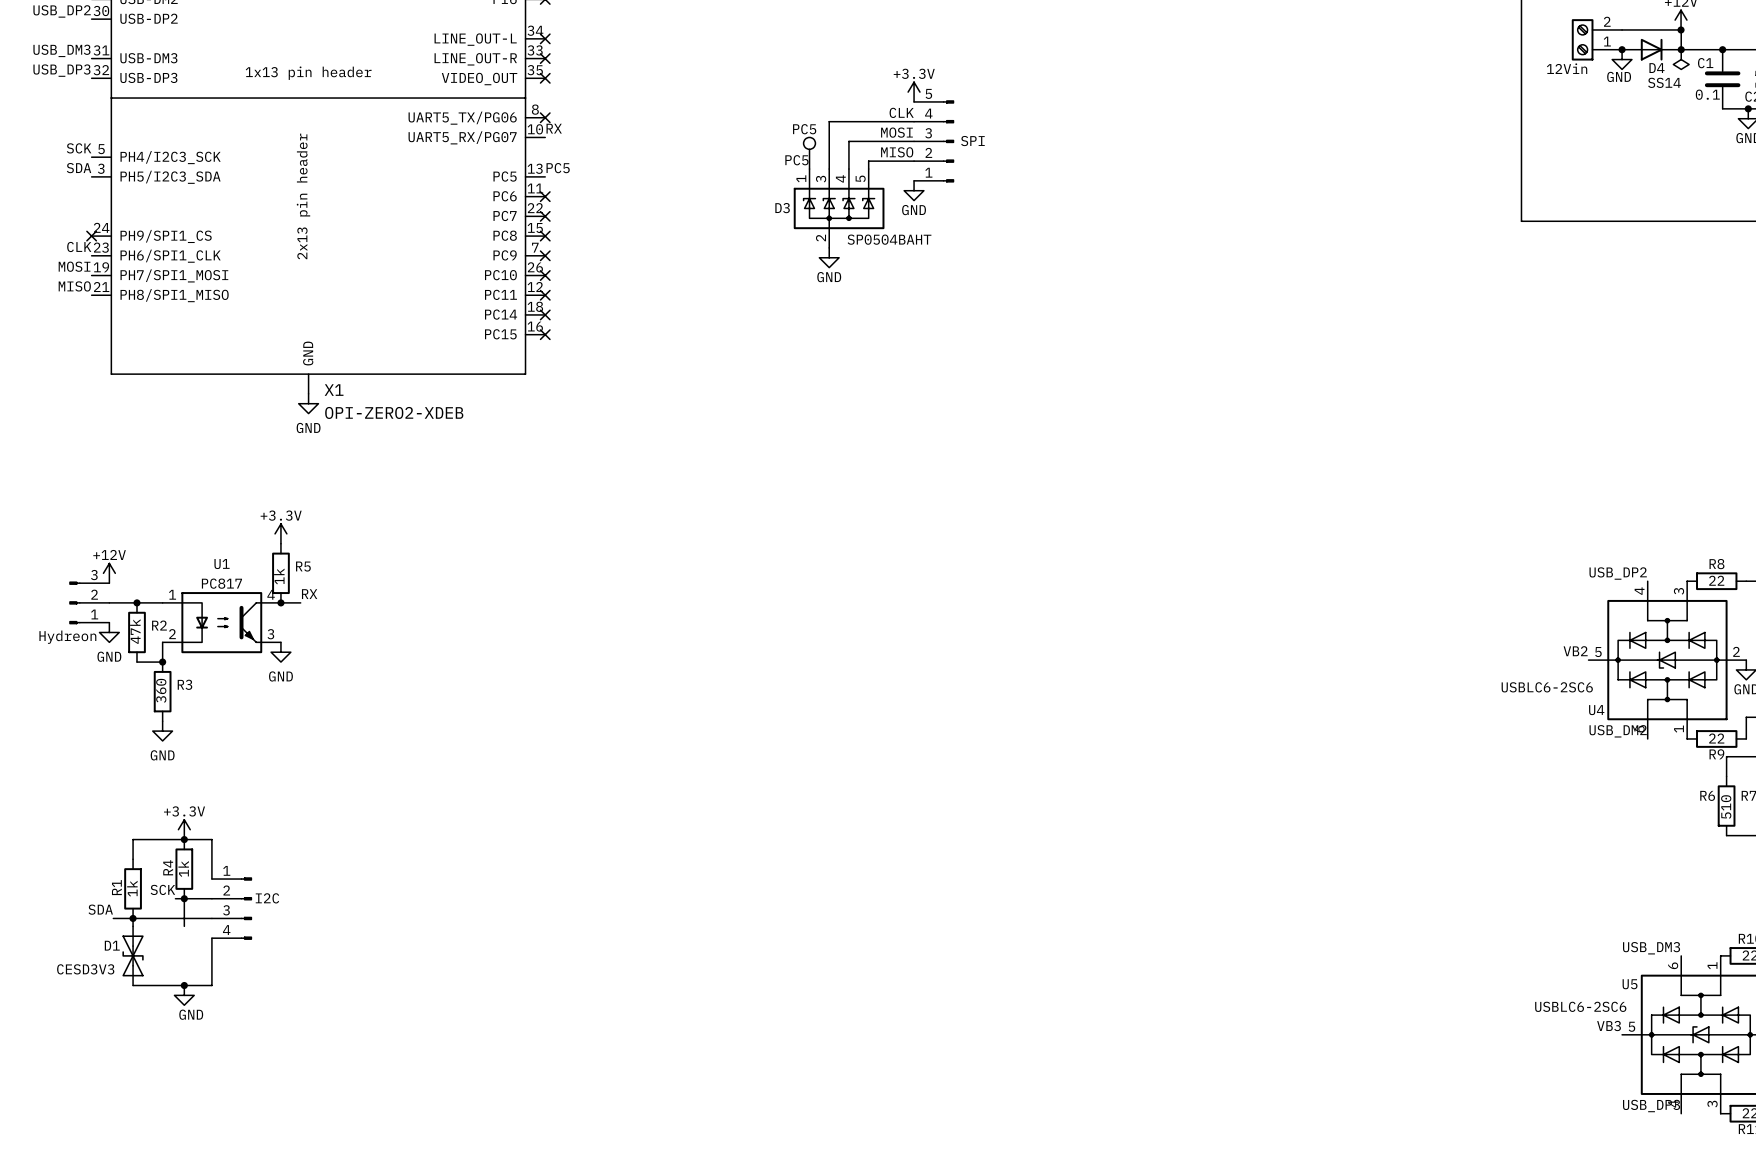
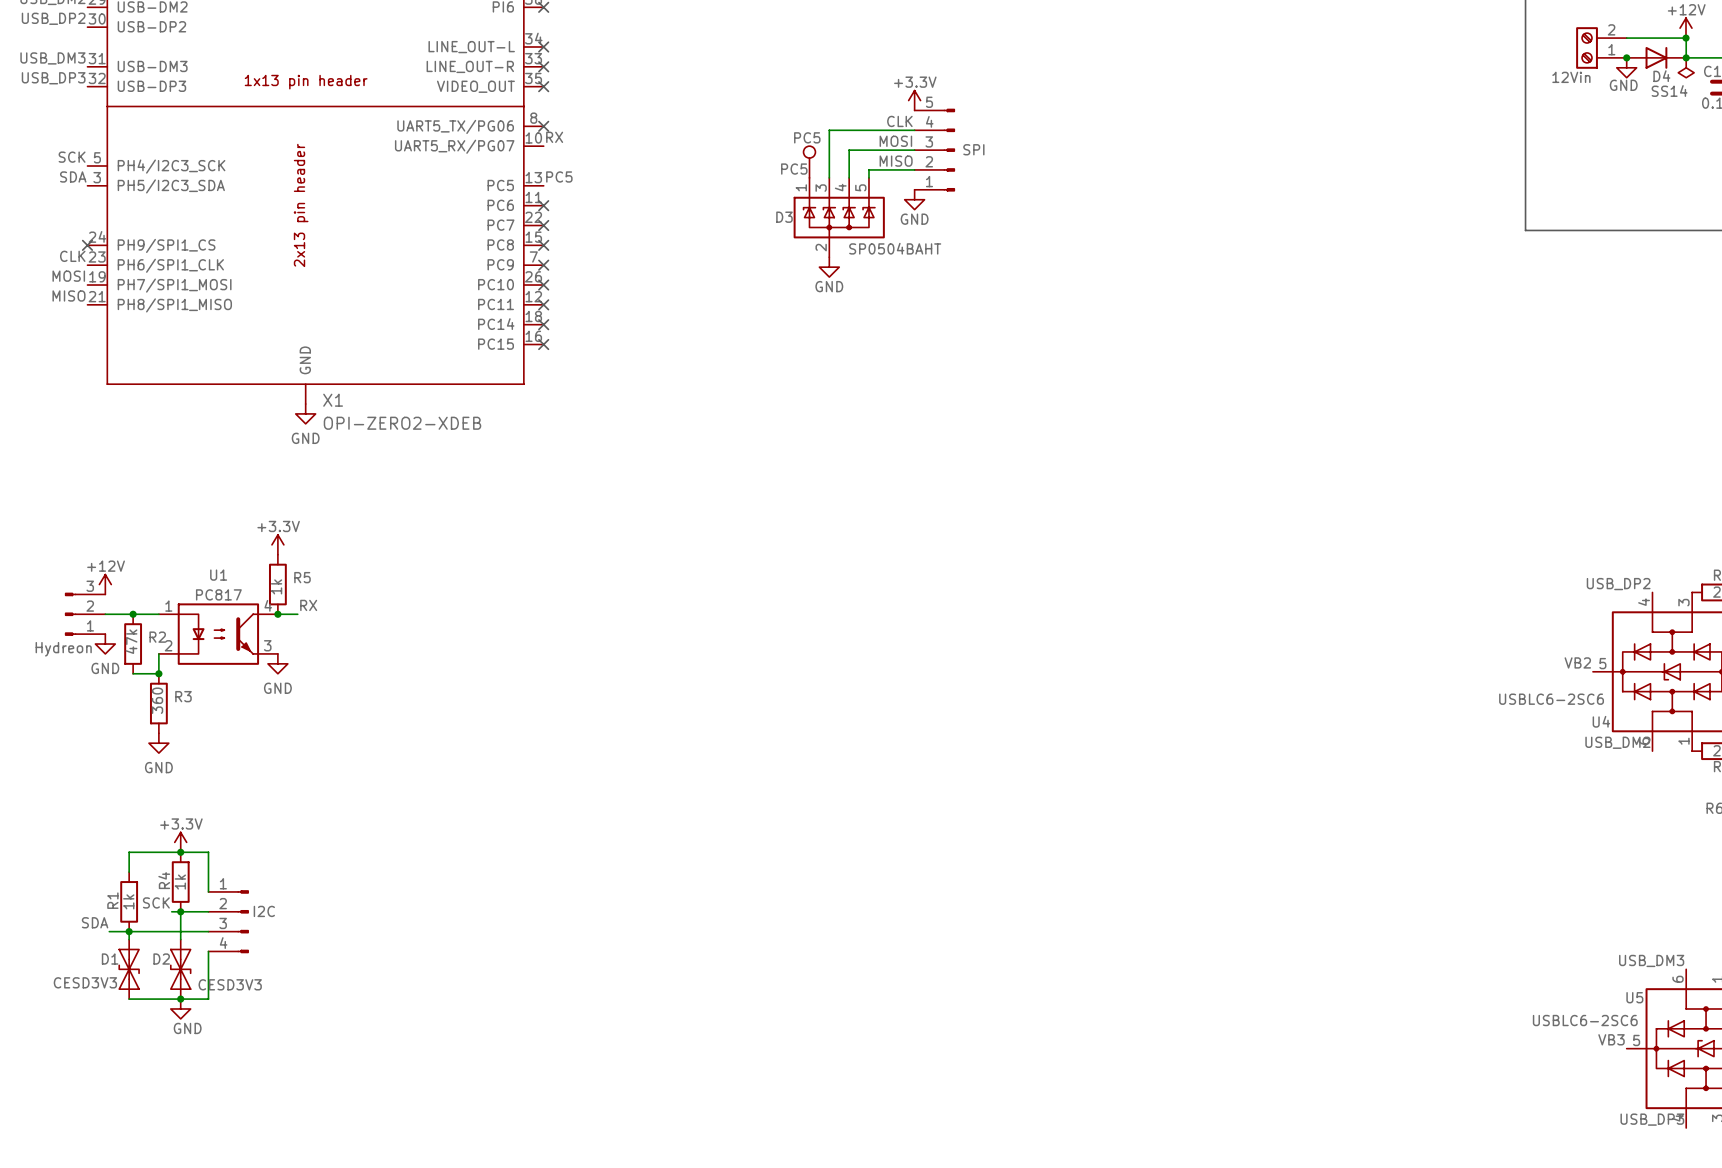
D2: none -> CESD3V3 (180, 969)

